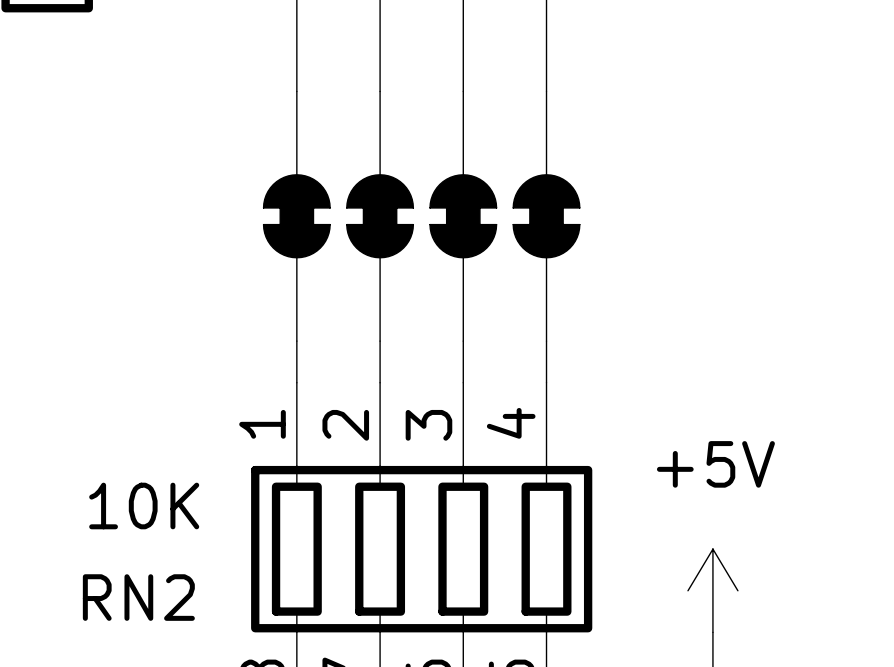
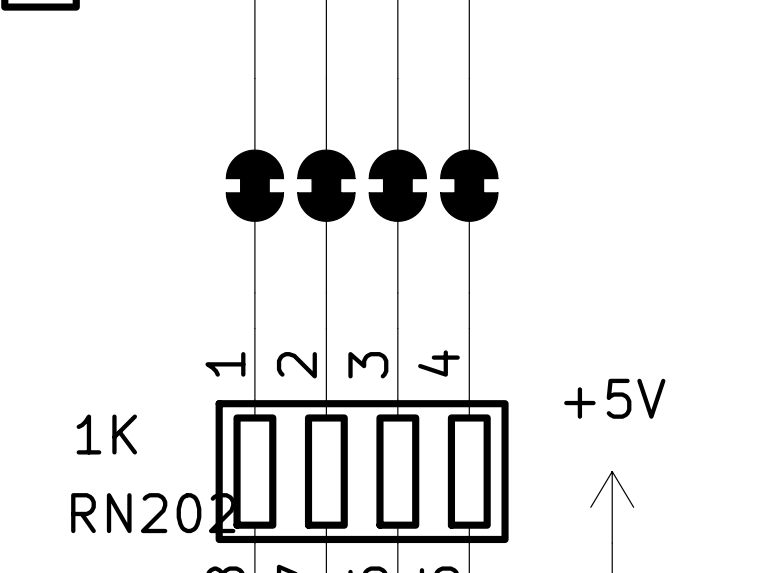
RN2 value: 10K (144, 505) -> 1K (106, 434)
RN2 name: RN2 (138, 597) -> RN202 (153, 513)

